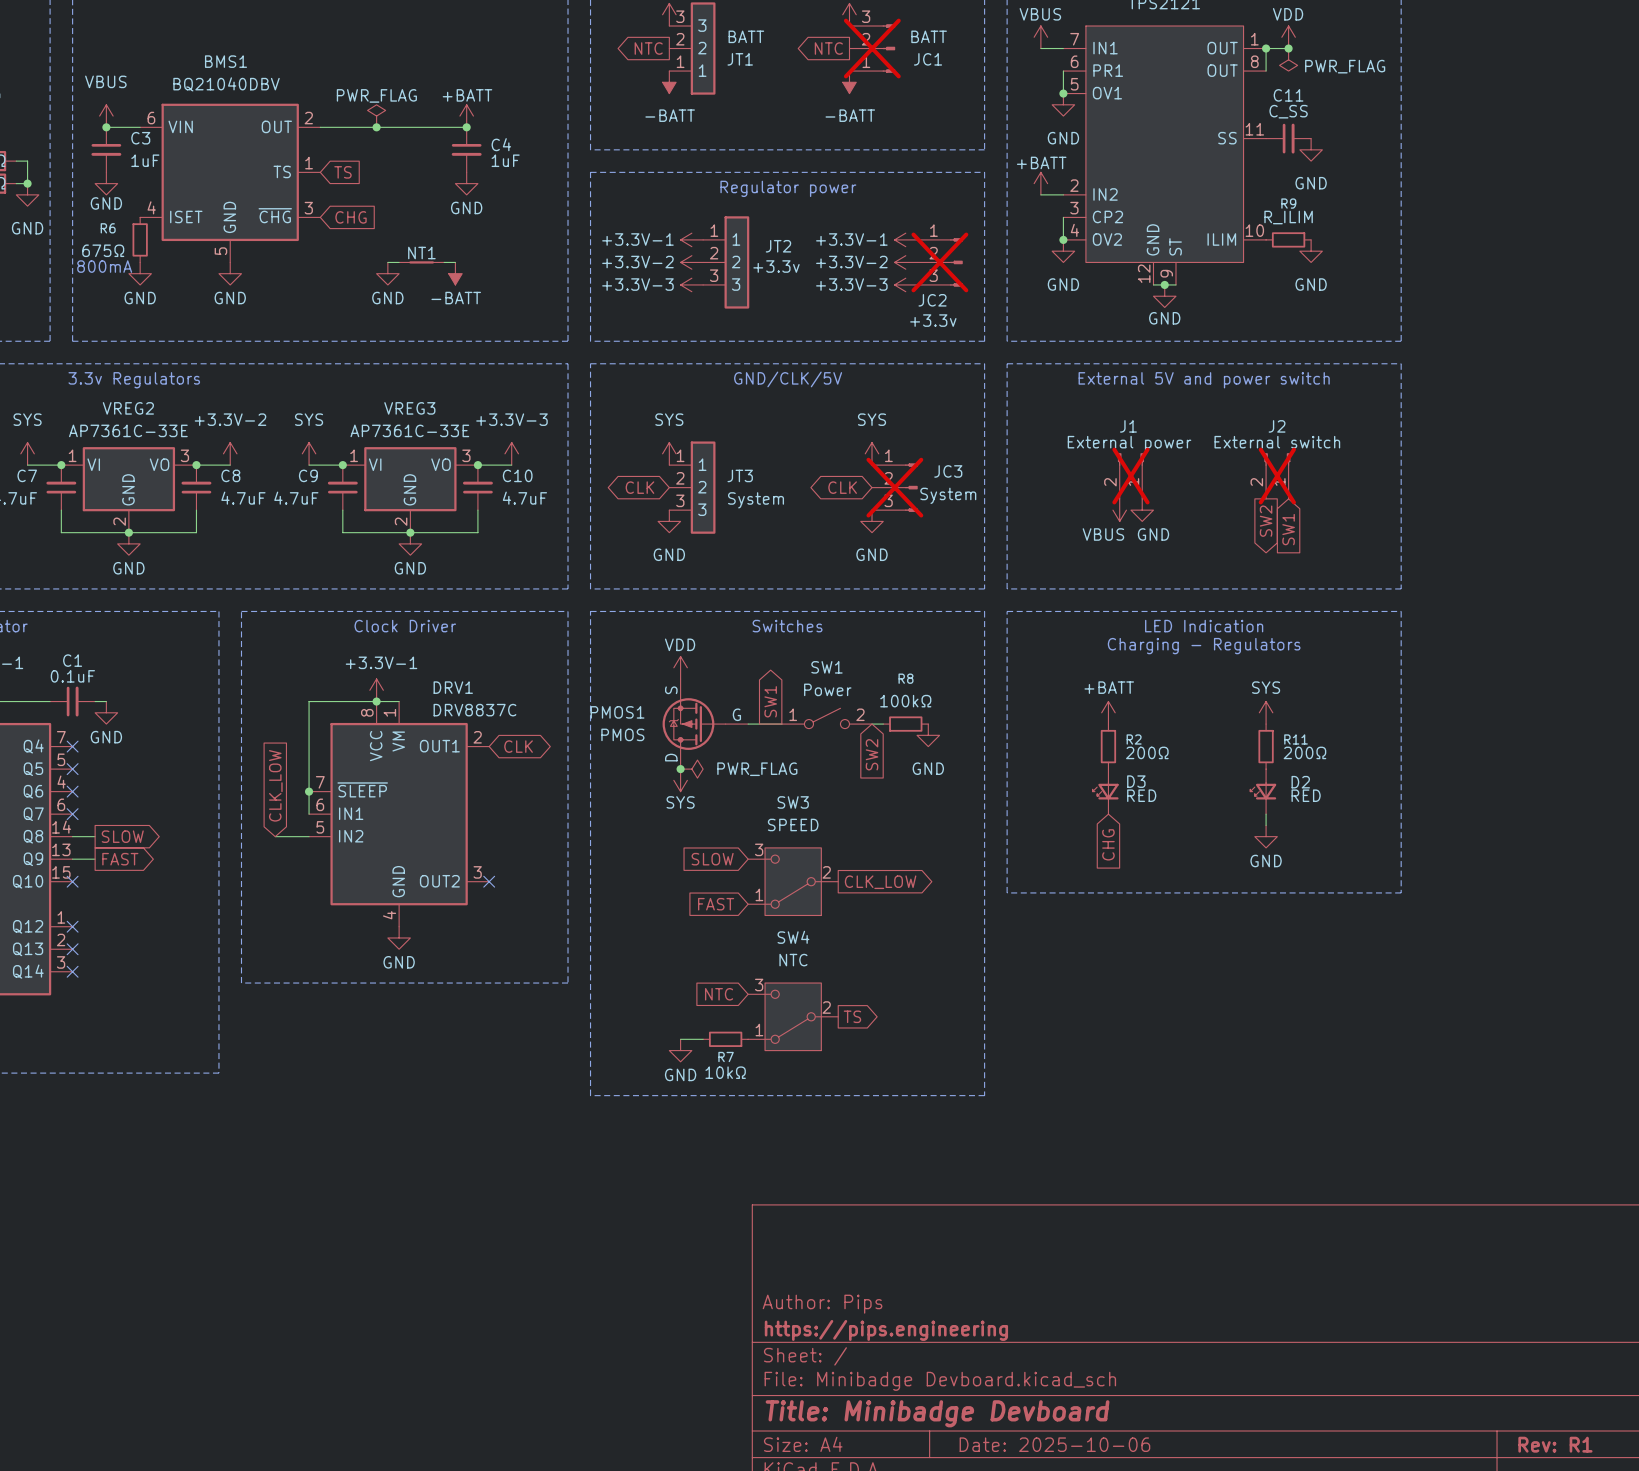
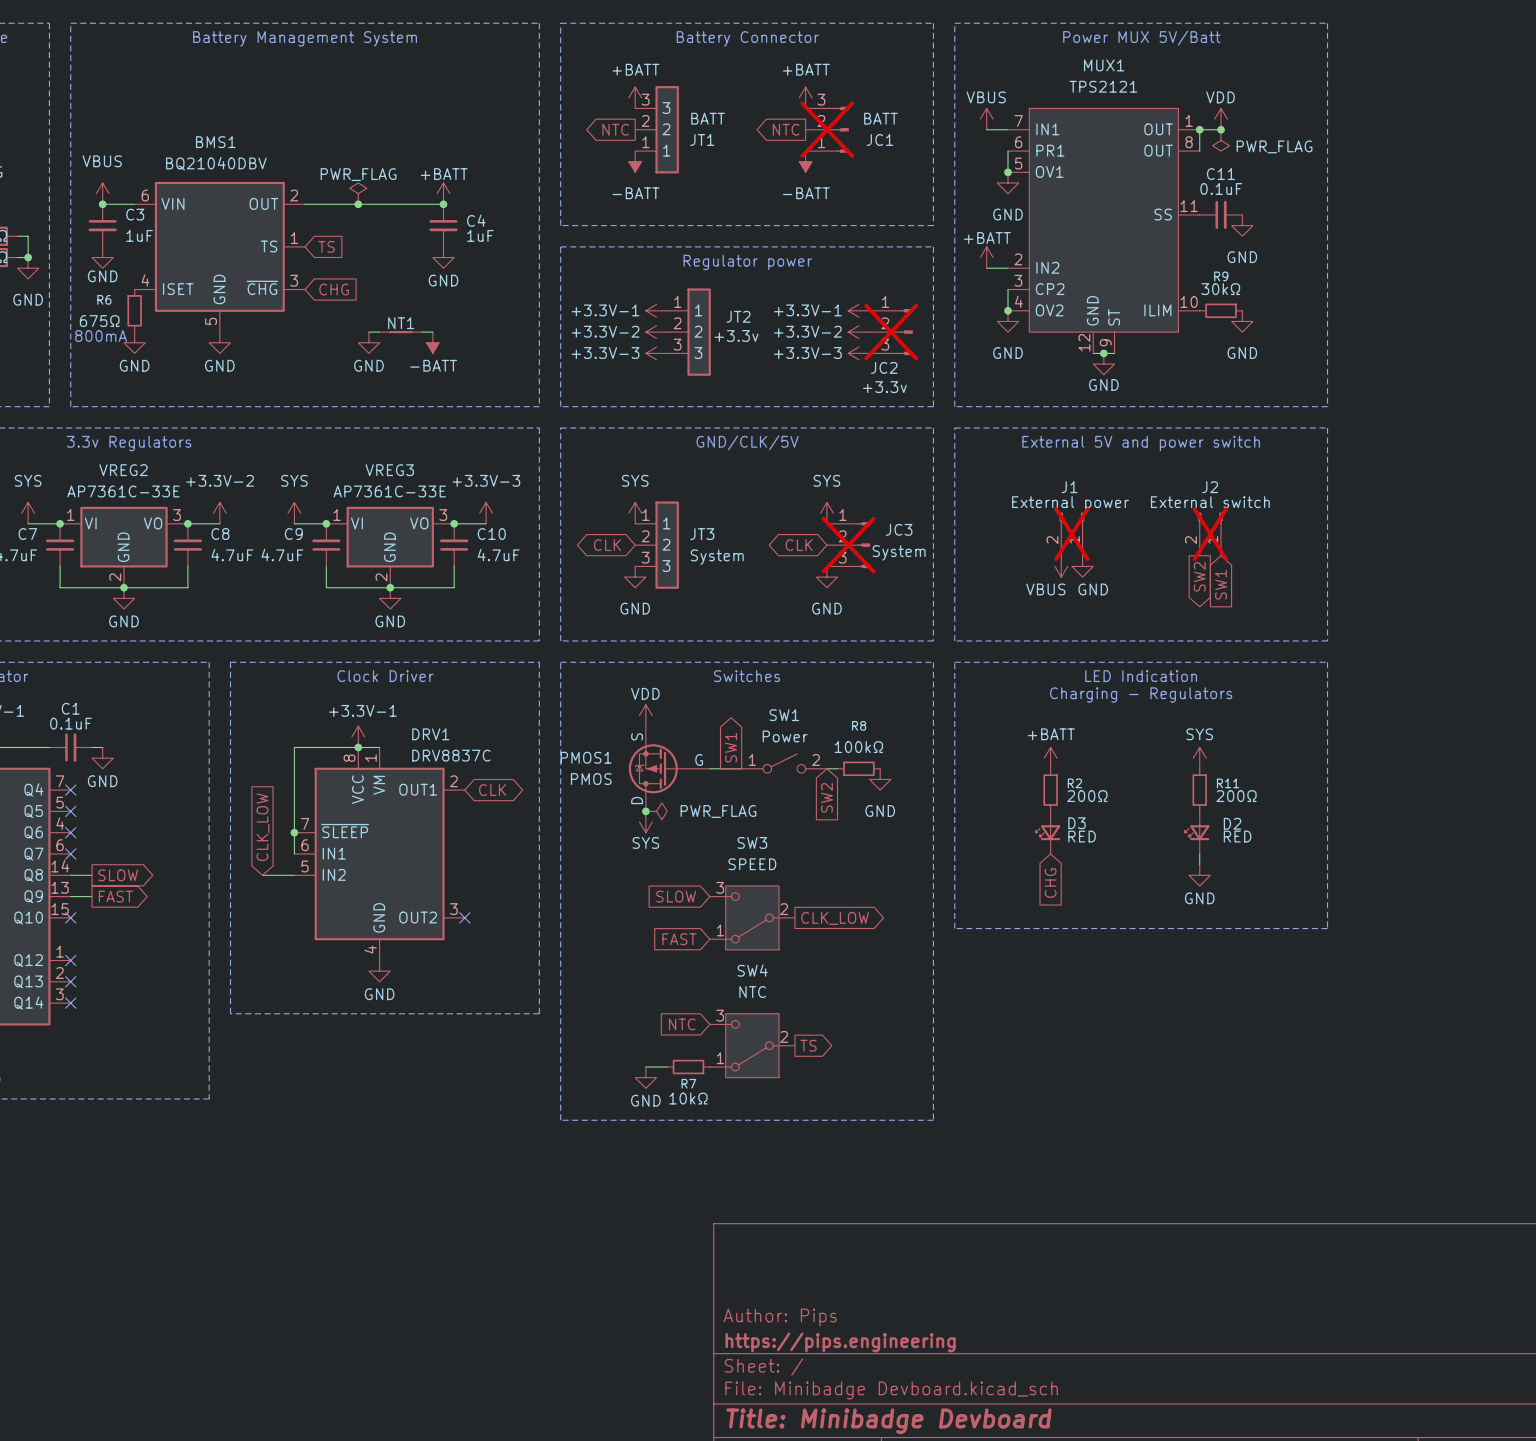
C11 value: C_SS (1288, 111) -> 0.1uF (1221, 188)
R9 value: R_ILIM (1288, 217) -> 30kΩ (1220, 289)

